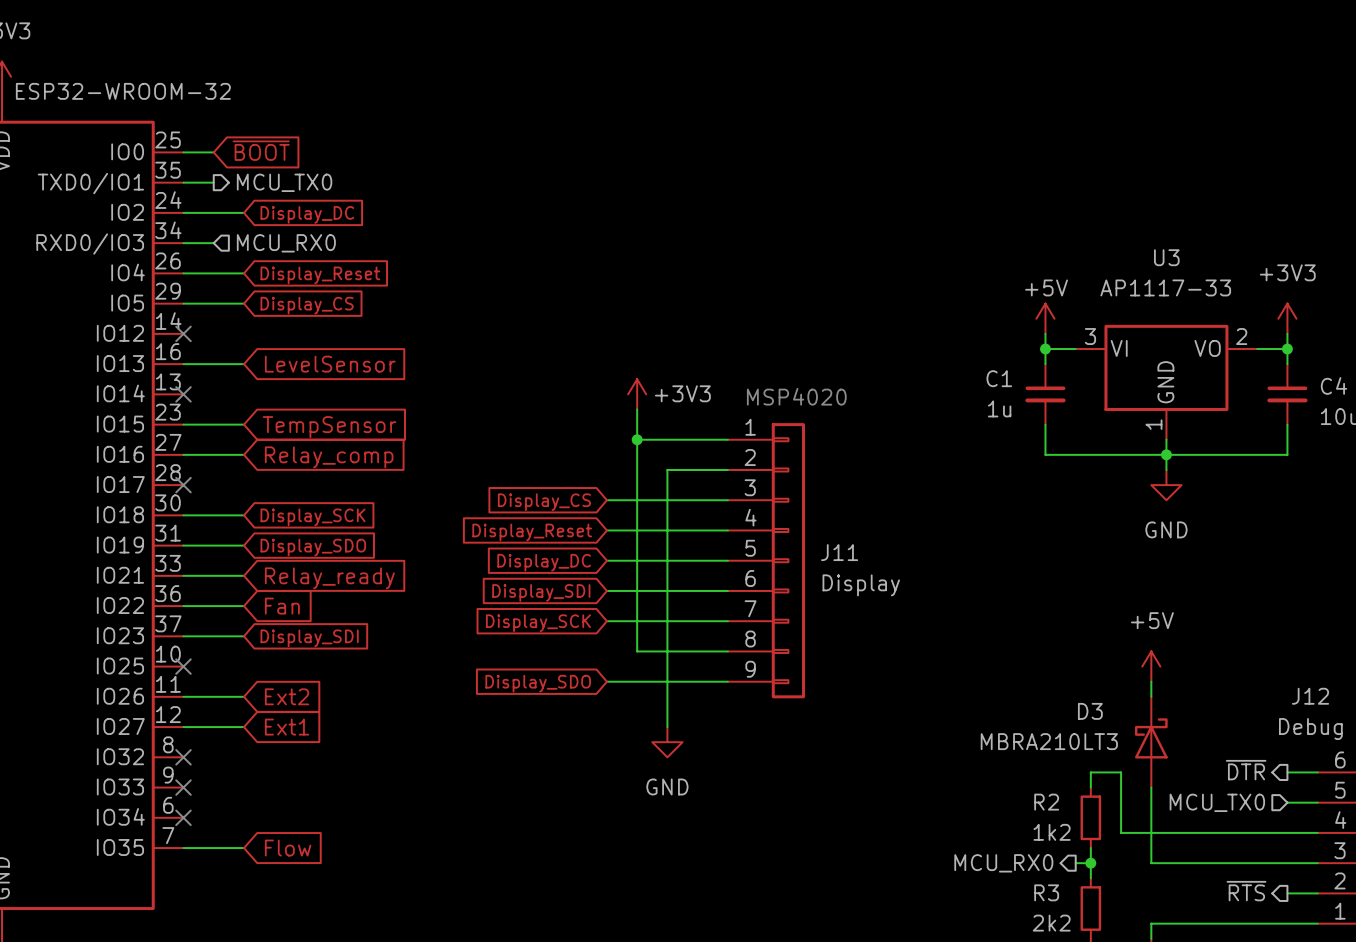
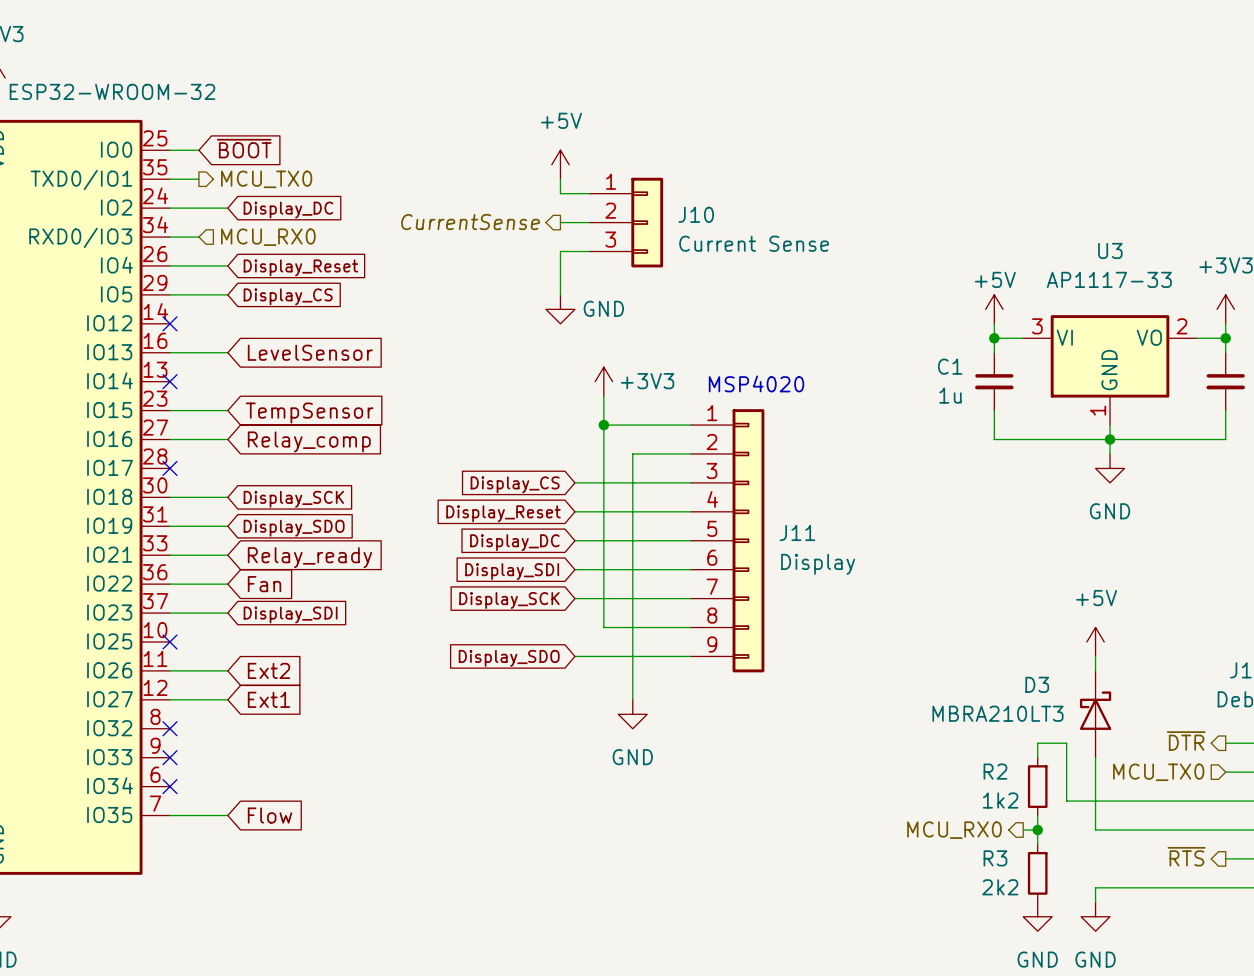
power symbol: none -> +5V (560, 164)
wire: none -> (560, 179) (560, 193) (589, 193)
hierarchical label: none -> CurrentSense (470, 222)
wire: none -> (560, 222) (589, 222)
J10: none -> Current Sense (626, 222)
wire: none -> (589, 251) (560, 251) (560, 294)
power symbol: none -> GND (560, 309)

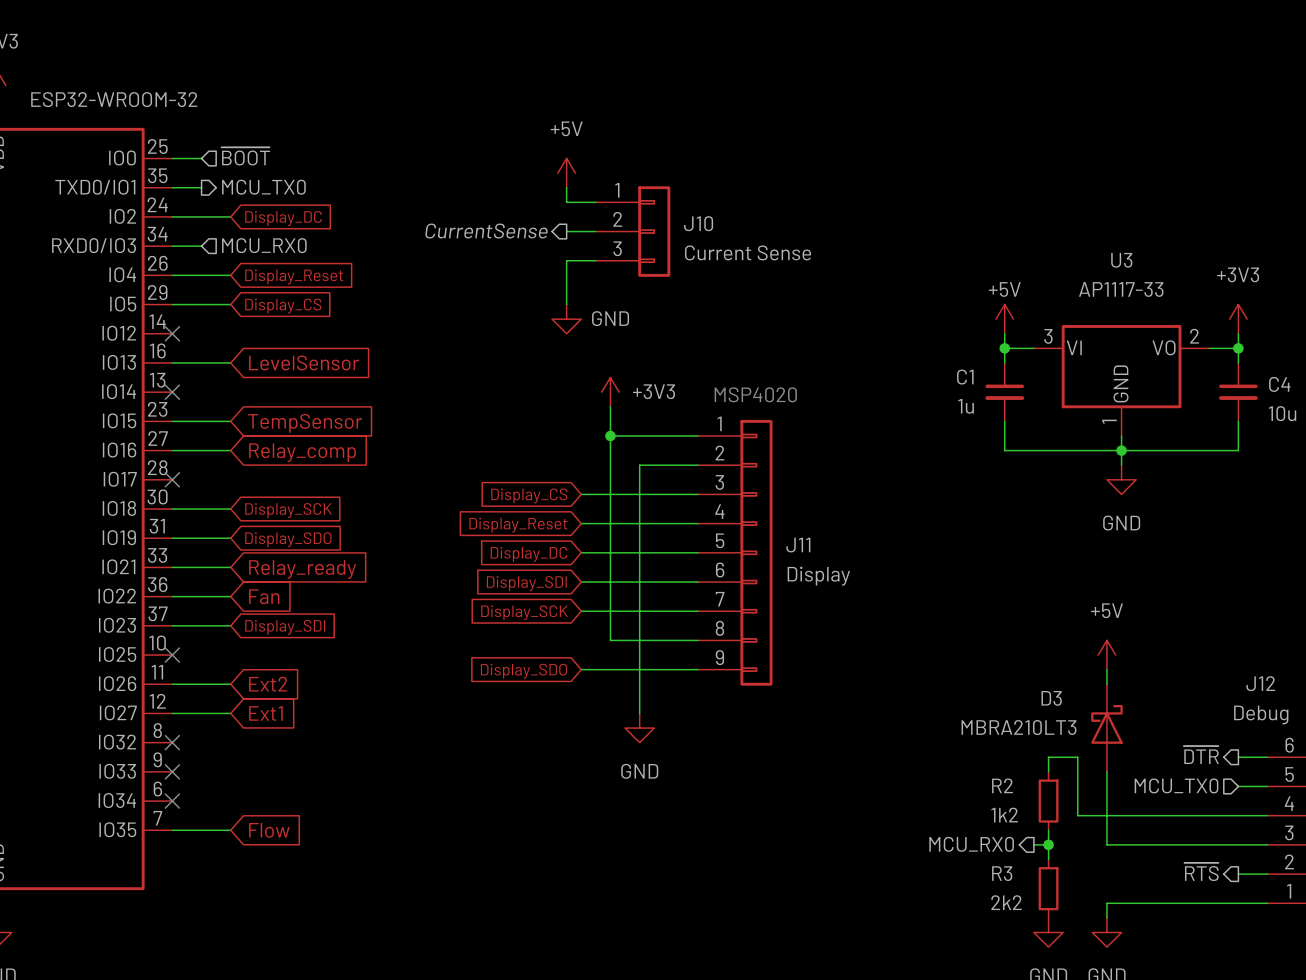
global label: ~{BOOT} (244, 148) -> none
hierarchical label: none -> ~{BOOT} (245, 156)

